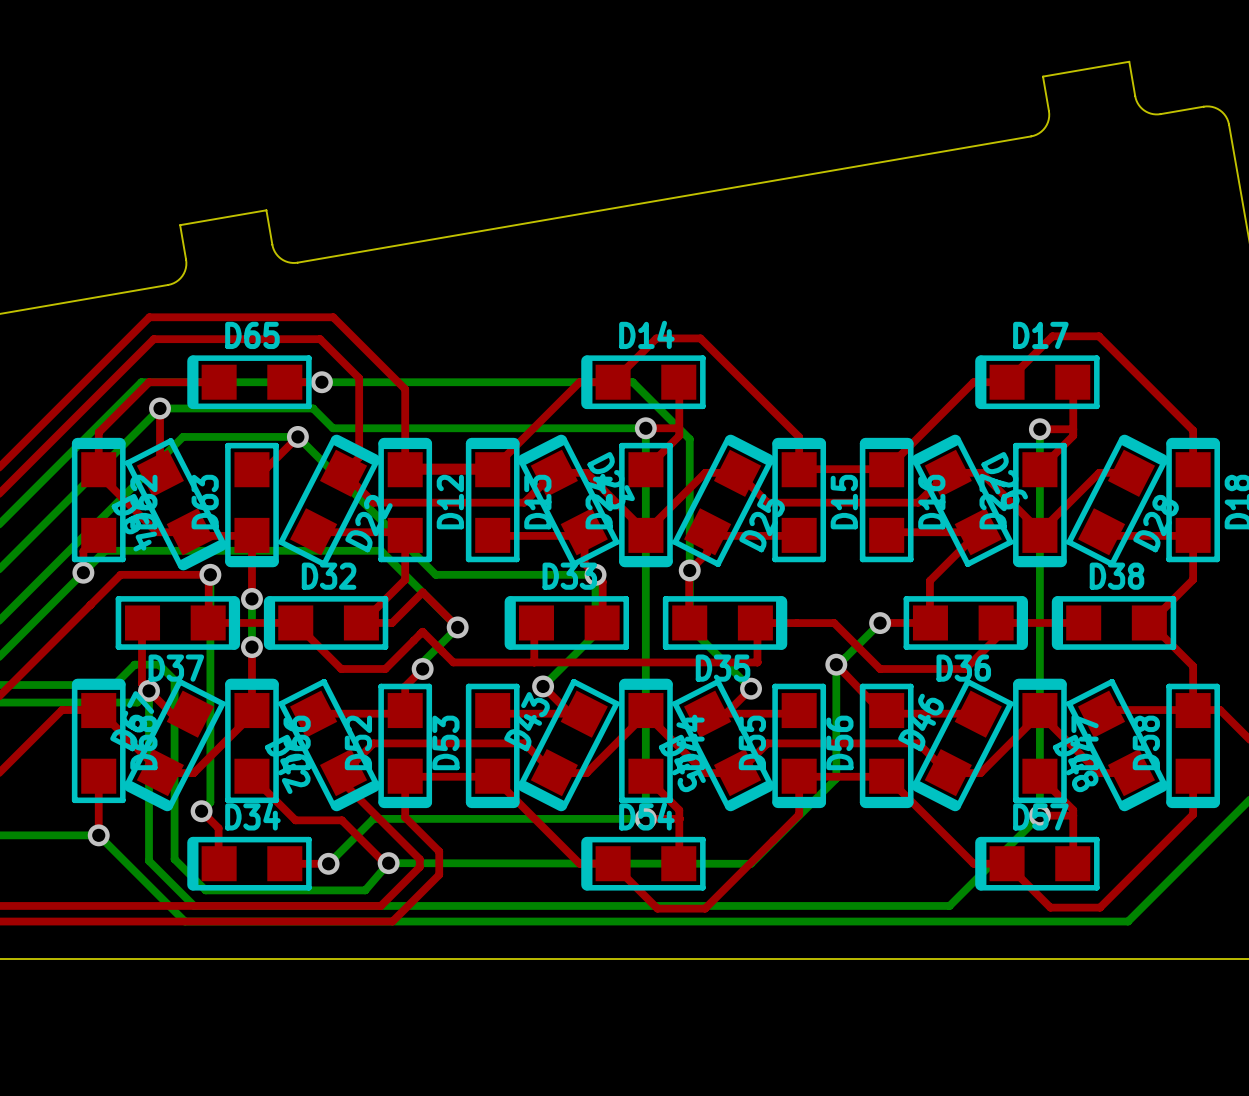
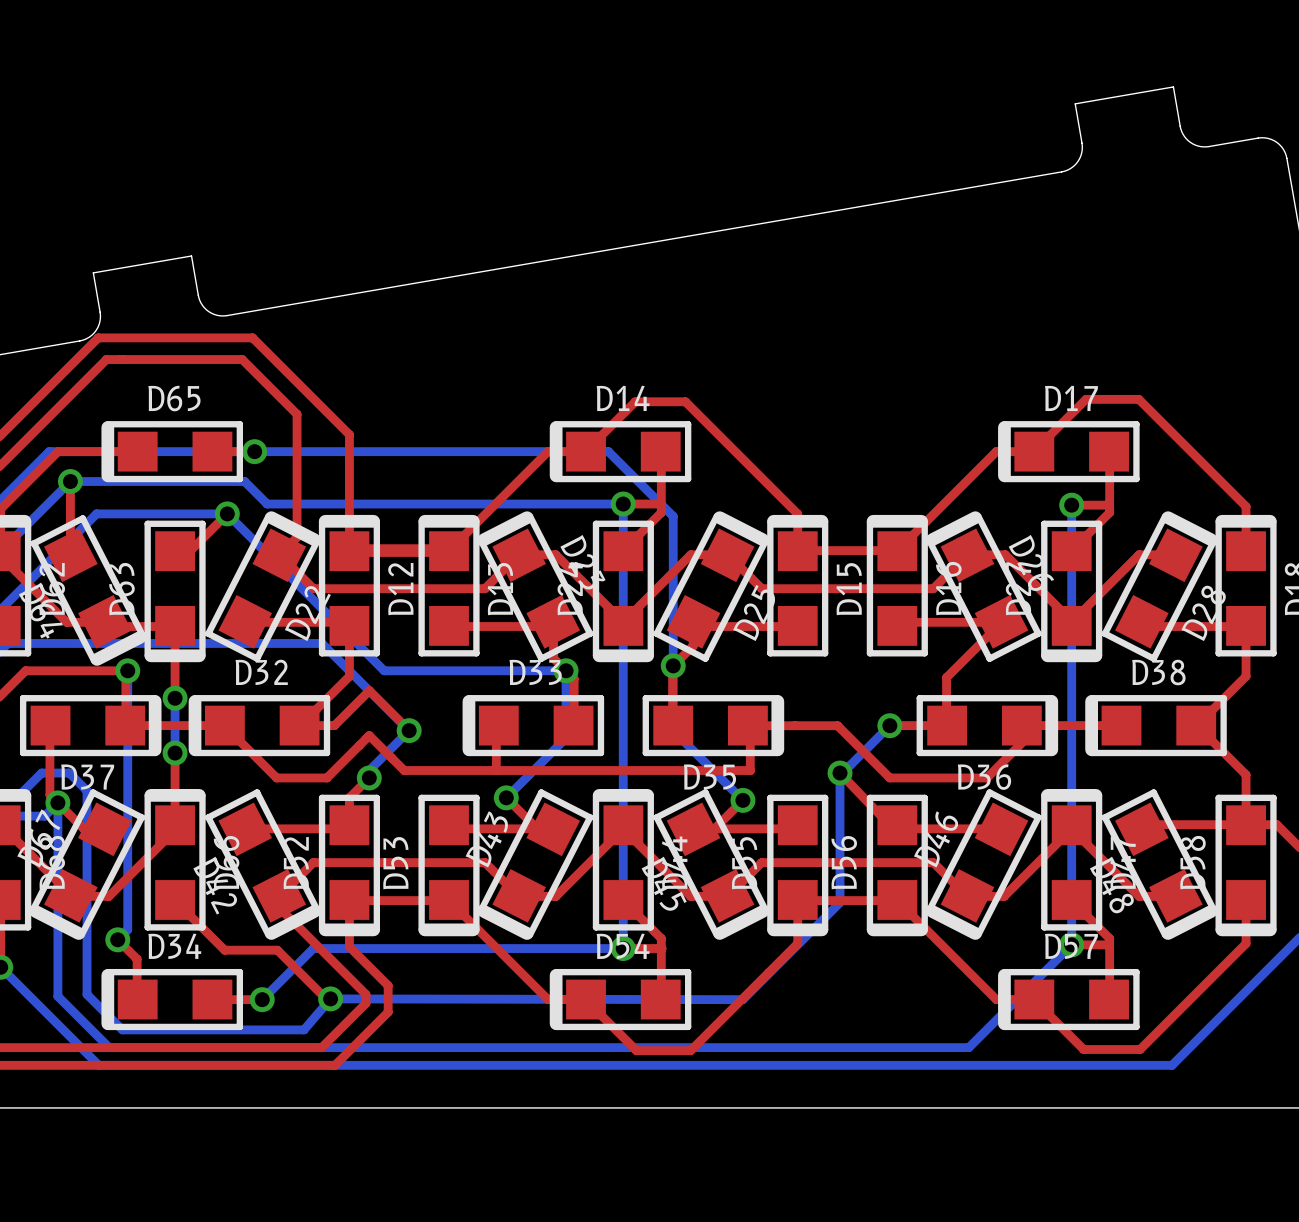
top track: (149, 317) (333, 317) (405, 389) -> (58, 377) (98, 337) (252, 337) (349, 434) (349, 459)
top track: (153, 339) (320, 339) (359, 378) -> (63, 402) (106, 359) (242, 359) (297, 414) (297, 447)

